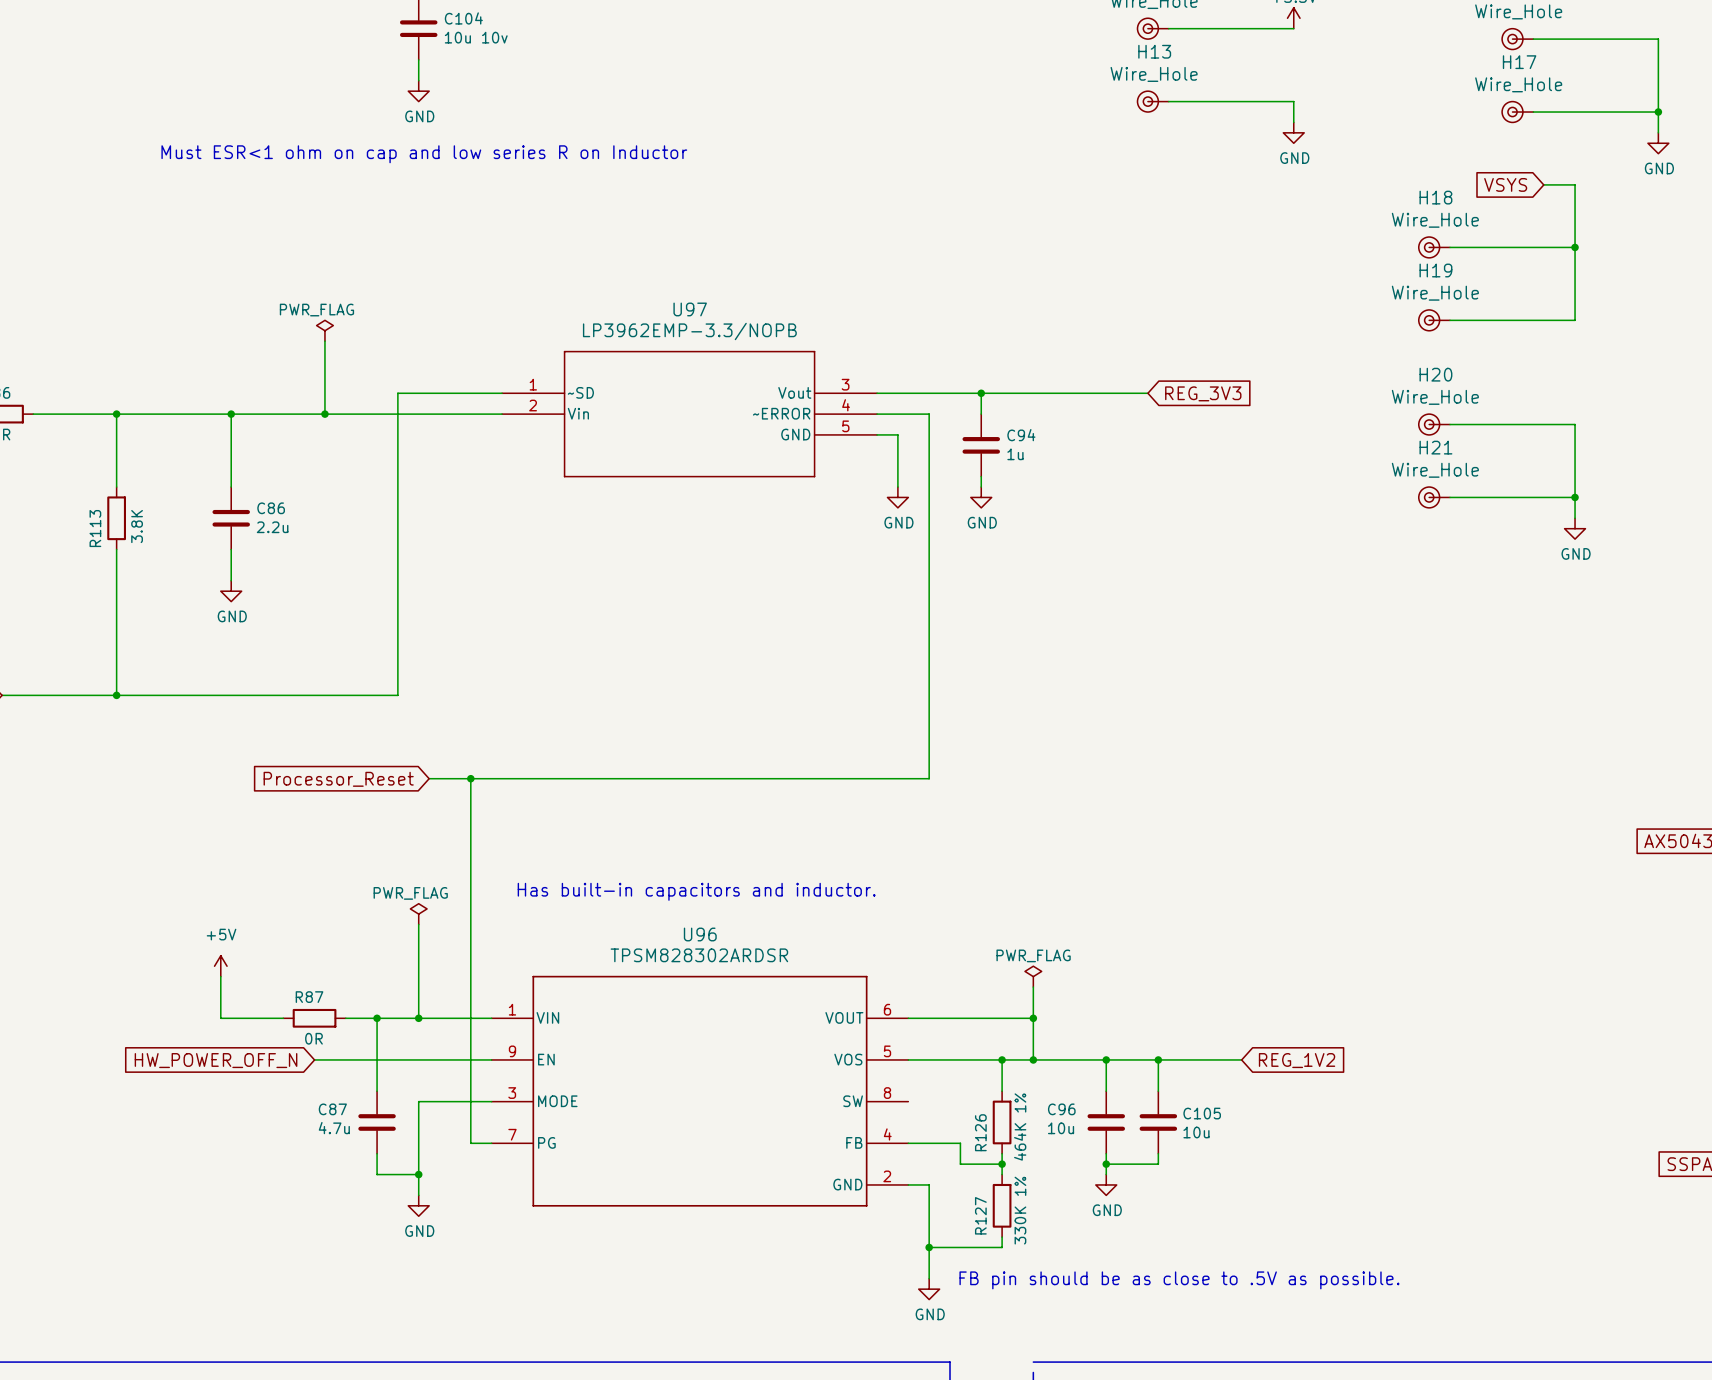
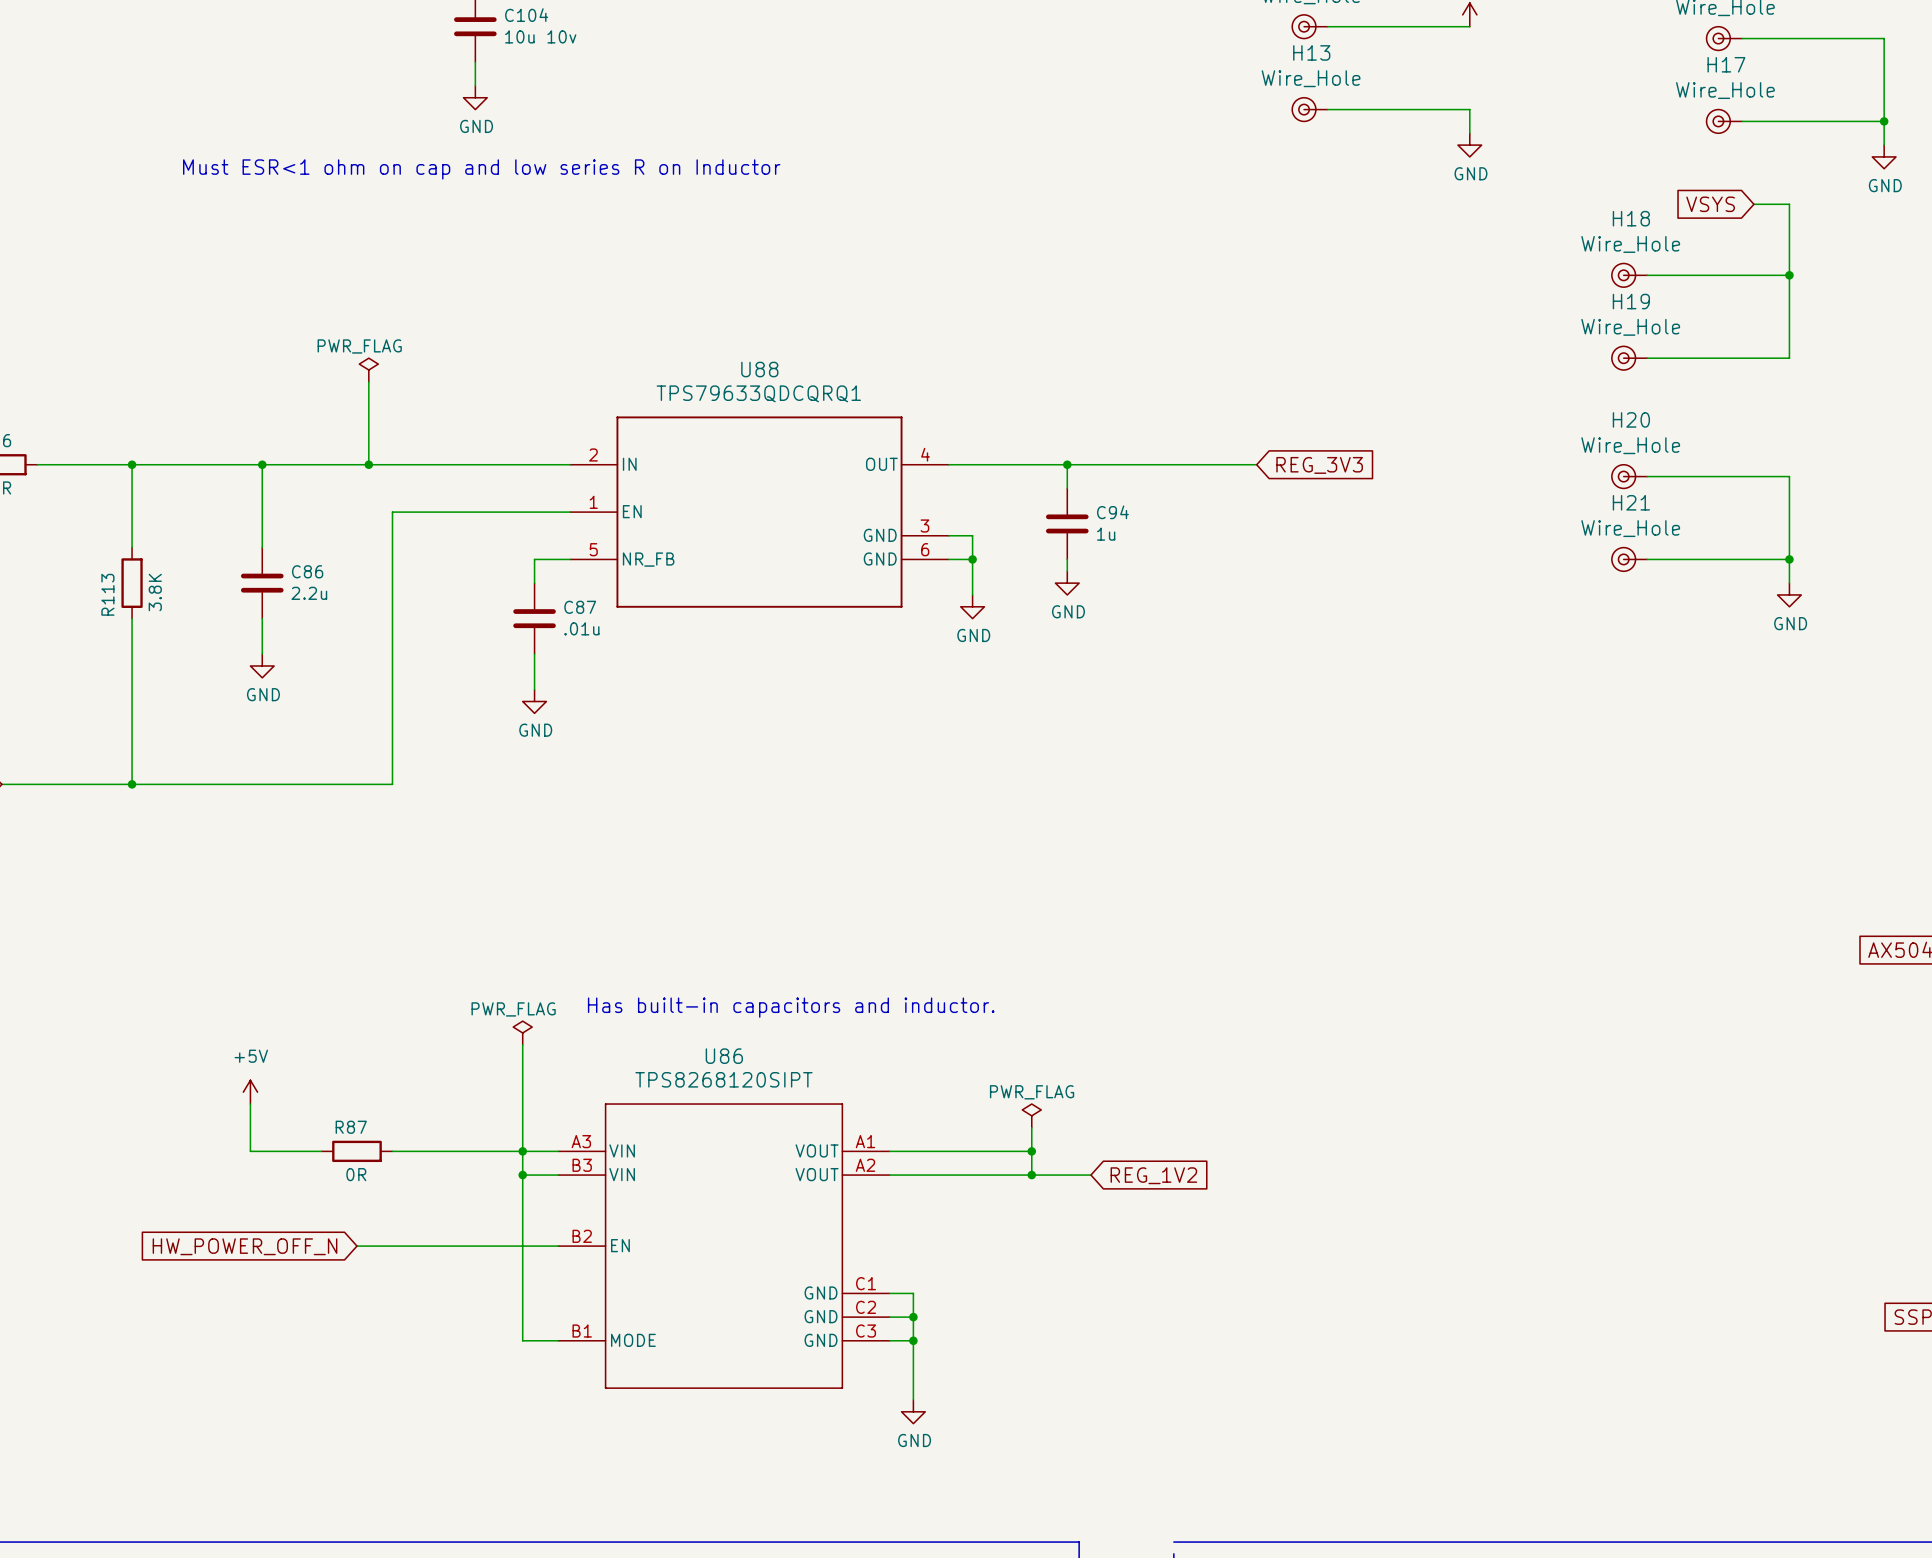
wire: (502, 393) (397, 393) (397, 695) (345, 695) -> (570, 512) (392, 512) (392, 784)
wire: (877, 393) (1147, 393) -> none
wire: (981, 393) (981, 414) -> (1067, 464) (1067, 488)
junction position: (981, 393) -> (1067, 464)
global label position: REG_3V3 (1203, 393) -> REG_3V3 (1319, 465)
U97: LP3962EMP-3.3/NOPB (689, 414) -> none
wire: (929, 414) (929, 778) (429, 778) -> (1055, 464) (1256, 464)
wire: (877, 434) (897, 434) (897, 487) -> (948, 535) (972, 535) (972, 594)
C94 position: (981, 445) -> (1067, 523)
U88: none -> TPS79633QDCQRQ1 (759, 512)
wire: (981, 476) (981, 487) -> (1067, 559) (1067, 571)
wire: none -> (570, 559) (534, 559) (534, 583)
wire: none -> (948, 559) (972, 559)
junction: none -> (972, 559)
power symbol: GND (897, 497) -> none
power symbol: GND (981, 497) -> none
power symbol: none -> GND (1067, 583)
power symbol: none -> GND (972, 606)
wire: none -> (534, 654) (534, 689)
power symbol: none -> GND (534, 701)
wire: (470, 778) (470, 1143) (491, 1143) -> none
junction: (470, 778) -> none
global label: Processor_Reset (338, 779) -> none
power symbol position: PWR_FLAG (418, 914) -> PWR_FLAG (522, 1032)
wire: (418, 924) (418, 1018) -> none
wire: none -> (522, 1044) (522, 1340) (558, 1340)
power symbol position: PWR_FLAG (1033, 976) -> PWR_FLAG (1031, 1115)
wire: (1033, 987) (1033, 1059) -> none
wire: none -> (1031, 1127) (1031, 1175)
wire: (377, 1018) (377, 1091) -> none
junction: (377, 1018) -> none
junction: (418, 1018) -> none
junction: none -> (522, 1151)
wire: (908, 1018) (1033, 1018) -> (1031, 1151) (889, 1151)
junction: none -> (1031, 1151)
junction: (1033, 1018) -> none
wire: none -> (522, 1175) (558, 1175)
junction: none -> (522, 1175)
wire: none -> (889, 1175) (1090, 1175)
junction: none -> (1031, 1175)
global label: none -> REG_1V2 (1153, 1175)
wire: (314, 1059) (491, 1059) -> none
wire: (908, 1059) (1241, 1059) -> none
wire: (1002, 1059) (1002, 1091) -> none
junction: (1002, 1059) -> none
junction: (1033, 1059) -> none
wire: (1106, 1059) (1106, 1091) -> none
junction: (1106, 1059) -> none
wire: (1158, 1059) (1158, 1091) -> none
junction: (1158, 1059) -> none
global label position: HW_POWER_OFF_N (216, 1060) -> HW_POWER_OFF_N (245, 1246)
global label: REG_1V2 (1297, 1060) -> none
U96: TPSM828302ARDSR (699, 1091) -> none
wire: (418, 1101) (418, 1195) -> (475, 1246) (356, 1246)
U86: none -> TPS8268120SIPT (723, 1246)
C87 name position: C87 (332, 1109) -> C87 (580, 607)
C87 position: (377, 1122) -> (534, 618)
R126: 464K 1% (1002, 1122) -> none
C96: 10u (1106, 1122) -> none
C105: 10u (1158, 1122) -> none
C87 value: 4.7u (334, 1128) -> .01u (581, 628)
wire: (908, 1143) (960, 1143) (960, 1164) (1002, 1164) -> none
wire: (377, 1153) (377, 1174) (418, 1174) -> none
wire: (1002, 1153) (1002, 1174) -> none
wire: (1106, 1153) (1106, 1174) -> none
wire: (1158, 1153) (1158, 1164) (1106, 1164) -> none
wire: none -> (889, 1317) (913, 1317)
junction: none -> (913, 1317)
junction: (1002, 1164) -> none
junction: (1106, 1164) -> none
junction: (418, 1174) -> none
wire: none -> (889, 1340) (913, 1340)
junction: none -> (913, 1340)
wire: (908, 1184) (929, 1184) (929, 1278) -> (889, 1293) (913, 1293) (913, 1399)
power symbol: GND (1106, 1184) -> none
power symbol: GND (418, 1205) -> none
R127: 330K 1% (1002, 1205) -> none
wire: (1002, 1237) (1002, 1247) (929, 1247) -> none
junction: (929, 1247) -> none
text: FB pin should be as close to .5V as possible. (1179, 1280) -> none
power symbol position: GND (929, 1289) -> GND (913, 1411)

